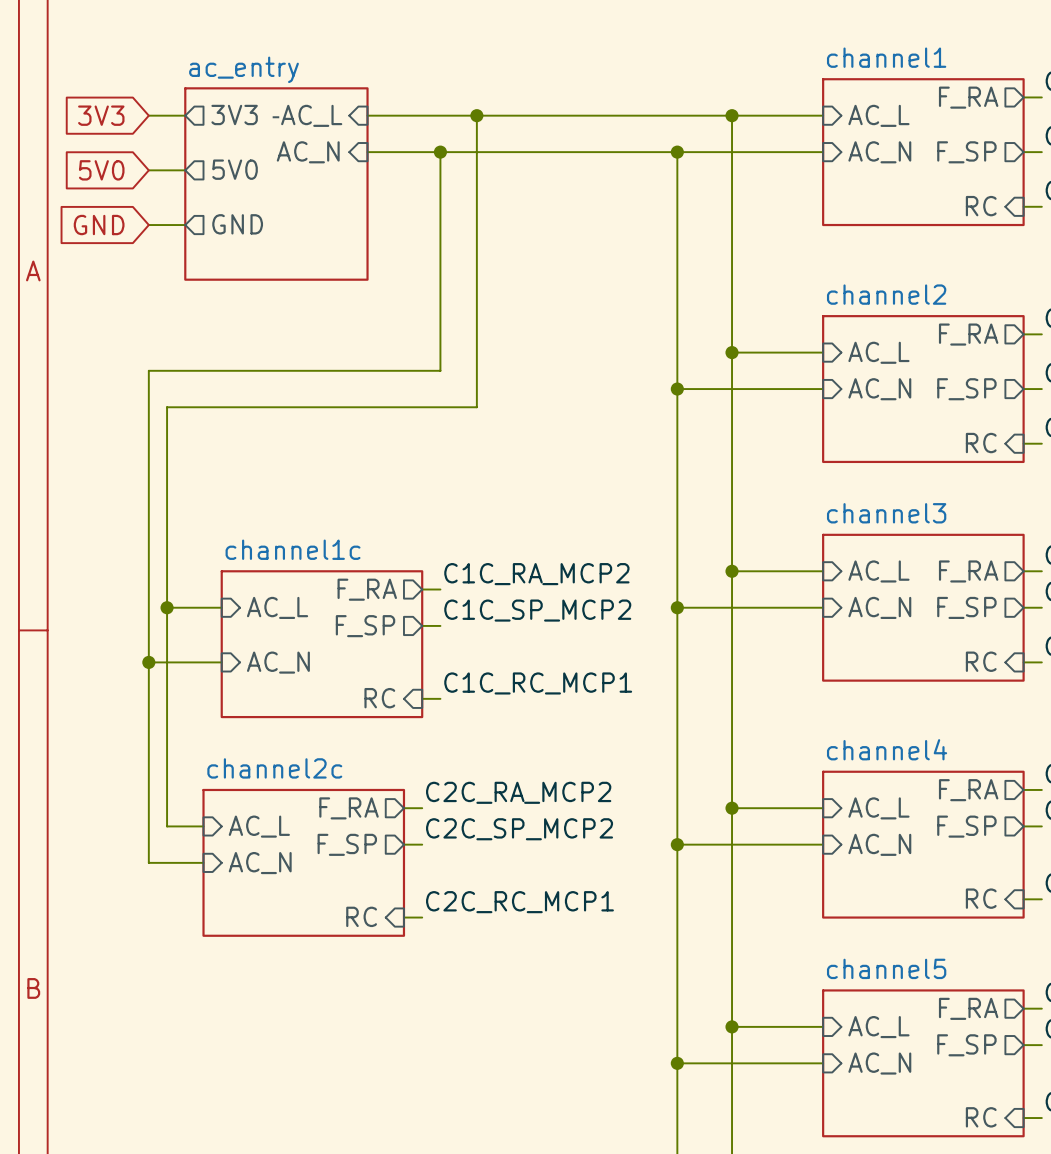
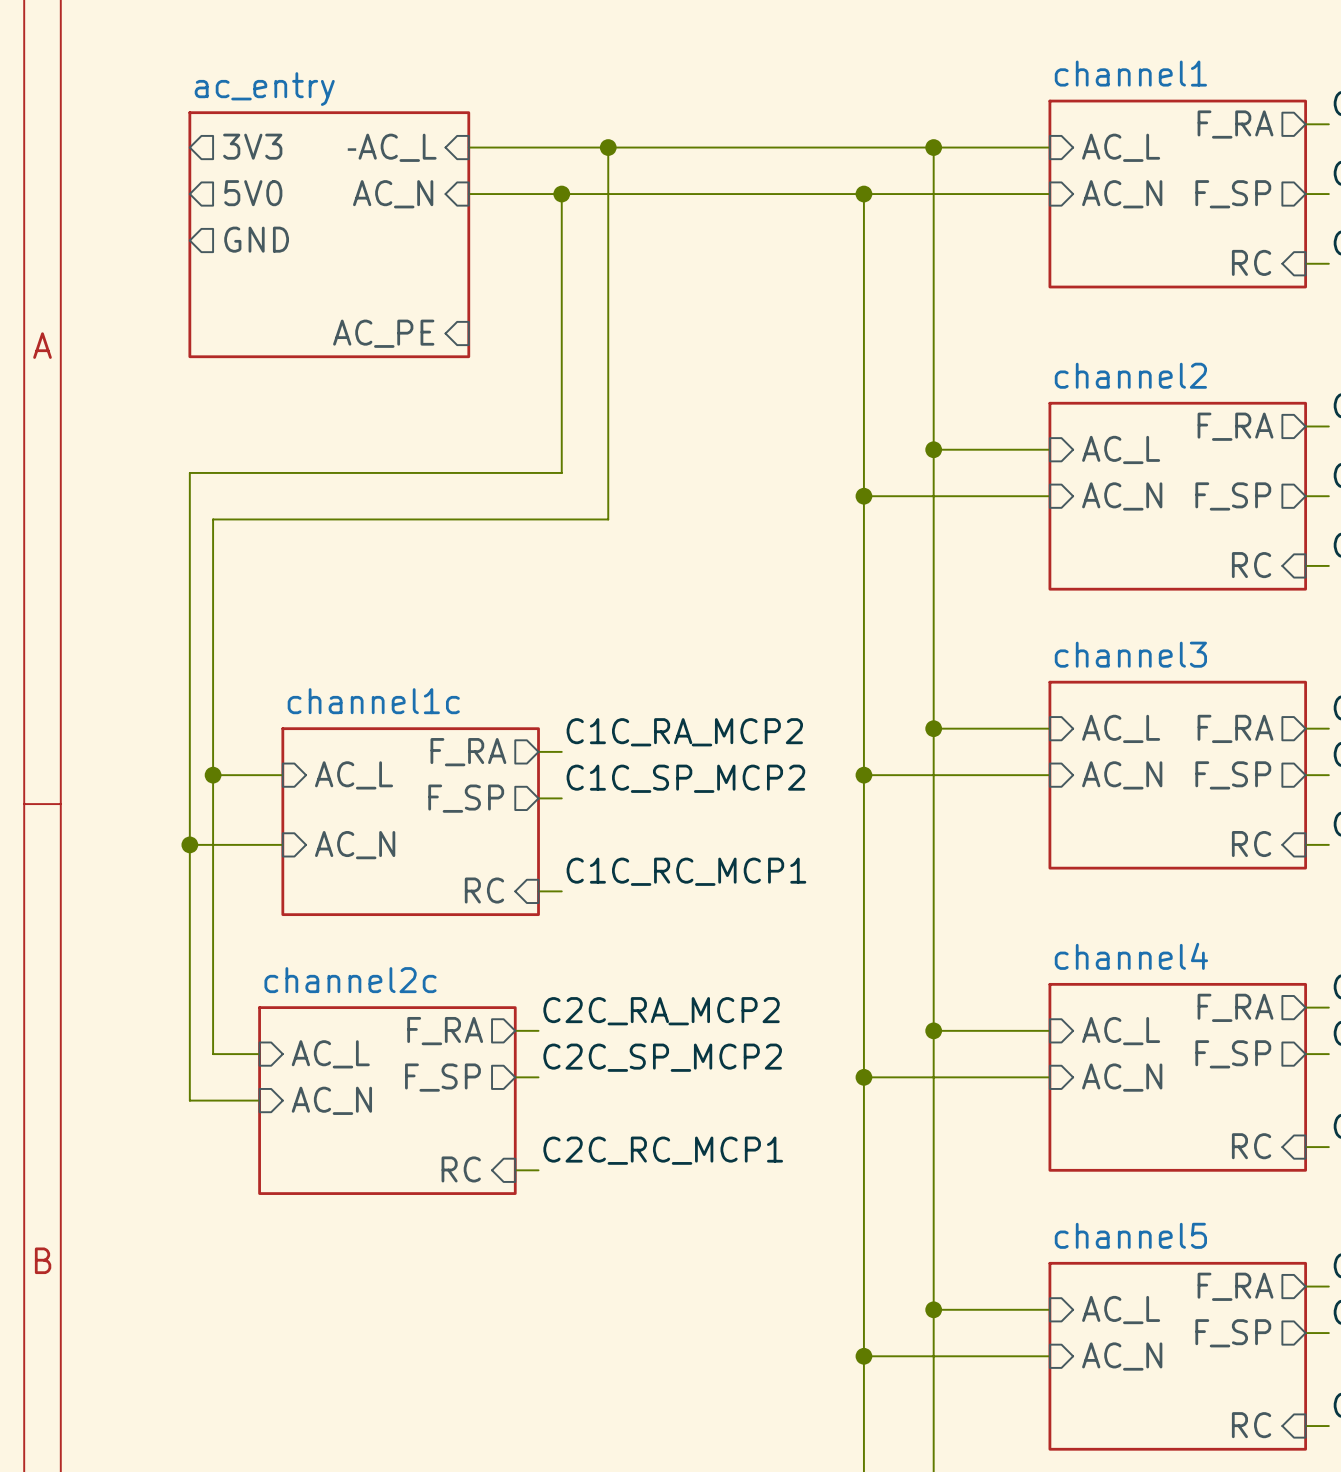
sheet pin position: 3V3 (234, 114) -> 3V3 (252, 146)
global label: 3V3 (101, 115) -> none
wire: (148, 115) (185, 115) -> none
sheet pin position: 5V0 (235, 169) -> 5V0 (253, 193)
global label: 5V0 (101, 170) -> none
wire: (148, 170) (185, 170) -> none
sheet ac_entry: none -> (329, 234)
sheet ac_entry: (276, 184) -> none
sheet pin position: GND (237, 224) -> GND (256, 239)
global label: GND (99, 225) -> none
wire: (148, 225) (185, 225) -> none
sheet pin: none -> AC_PE (383, 333)

